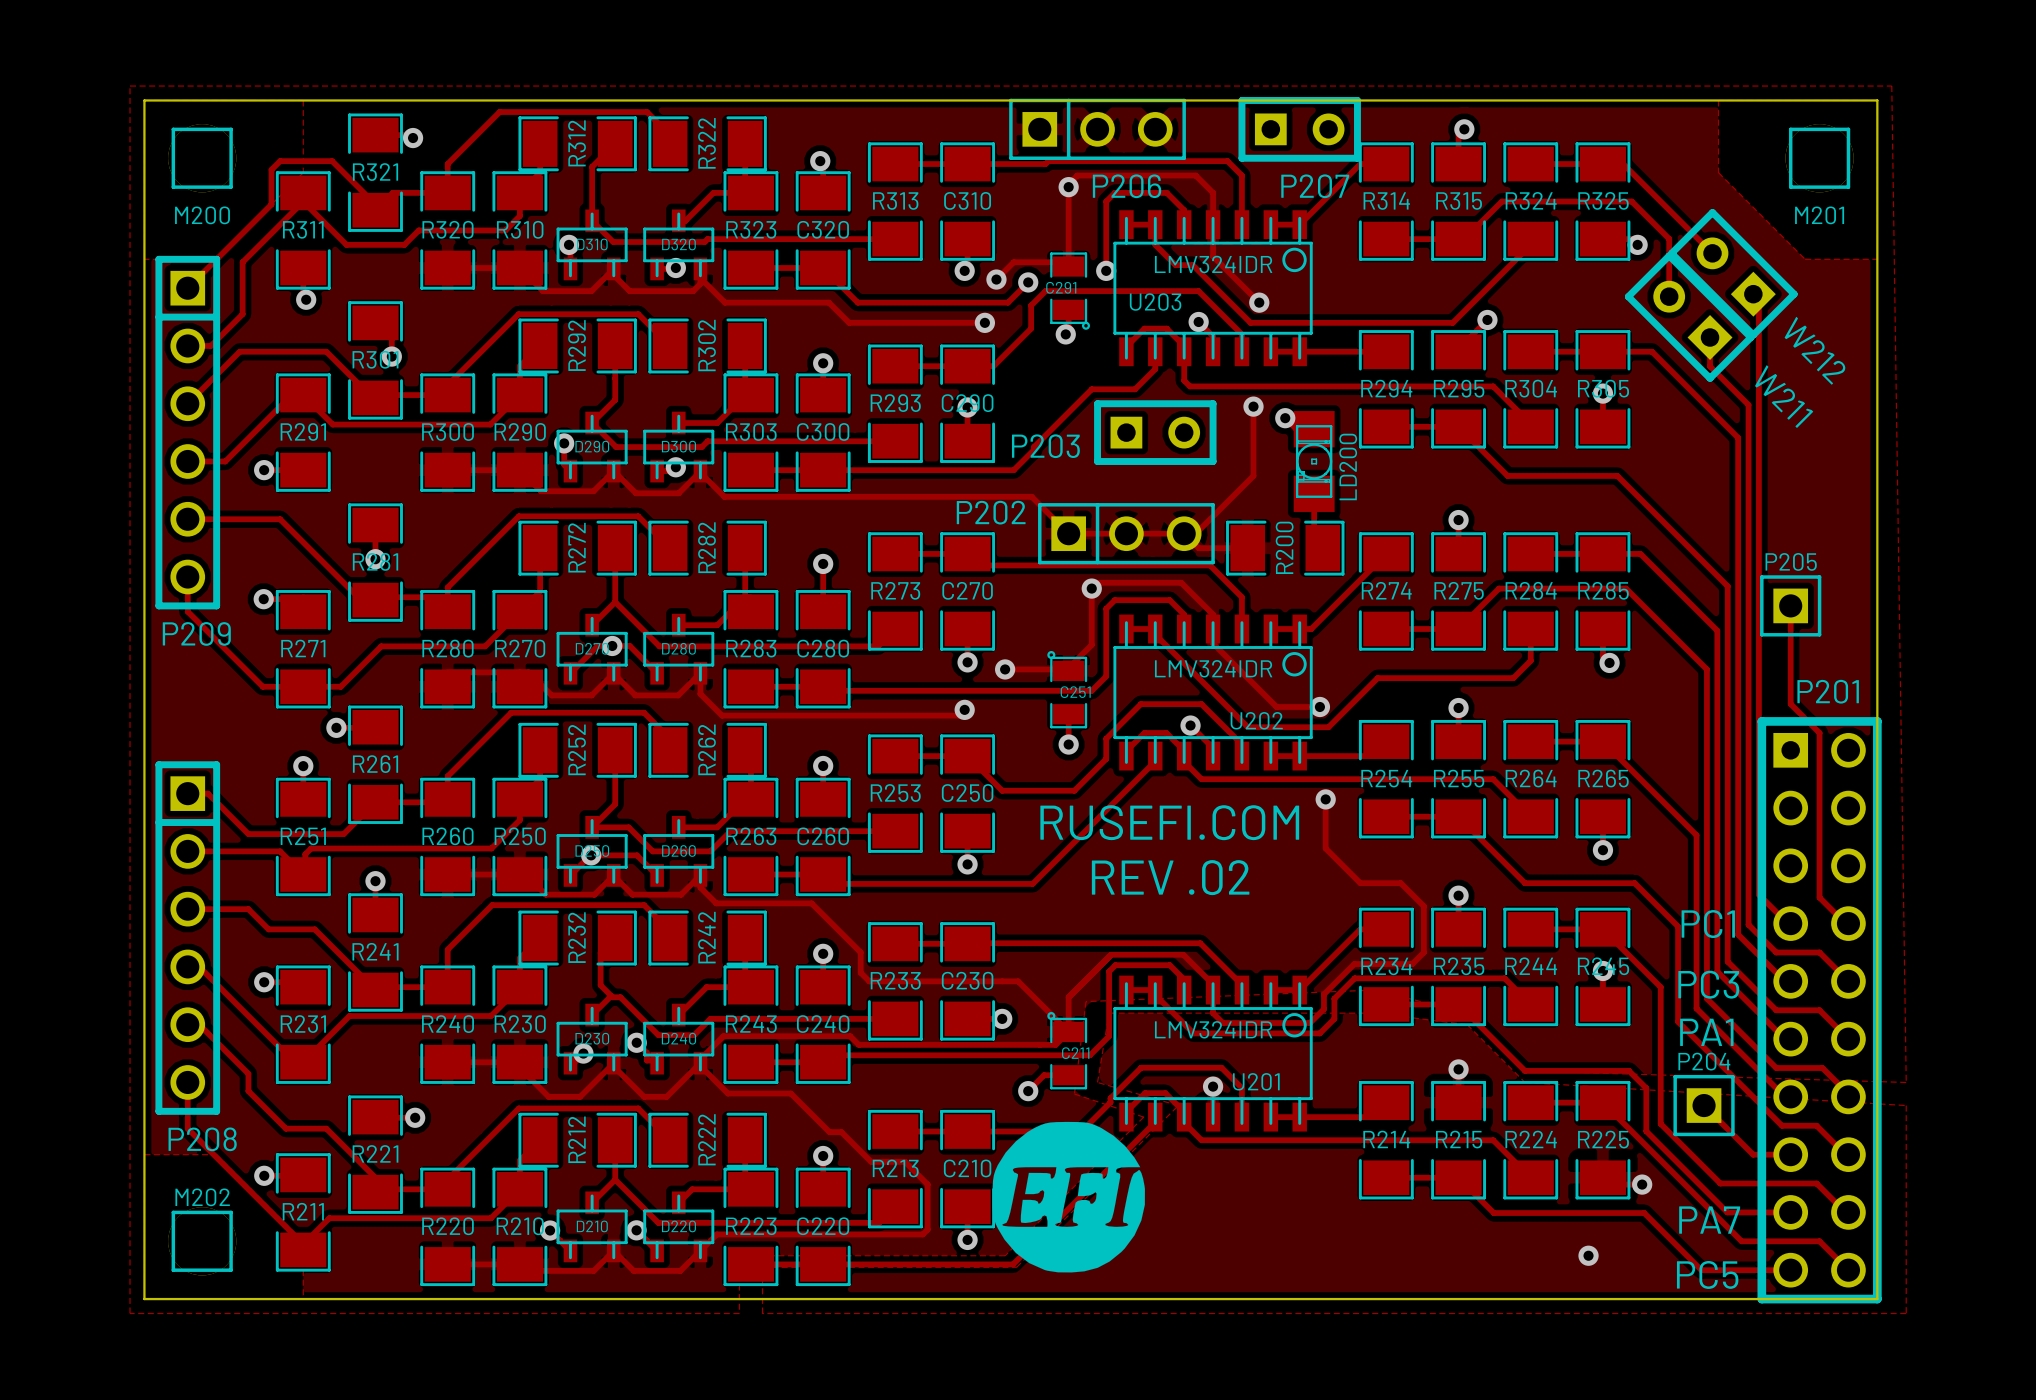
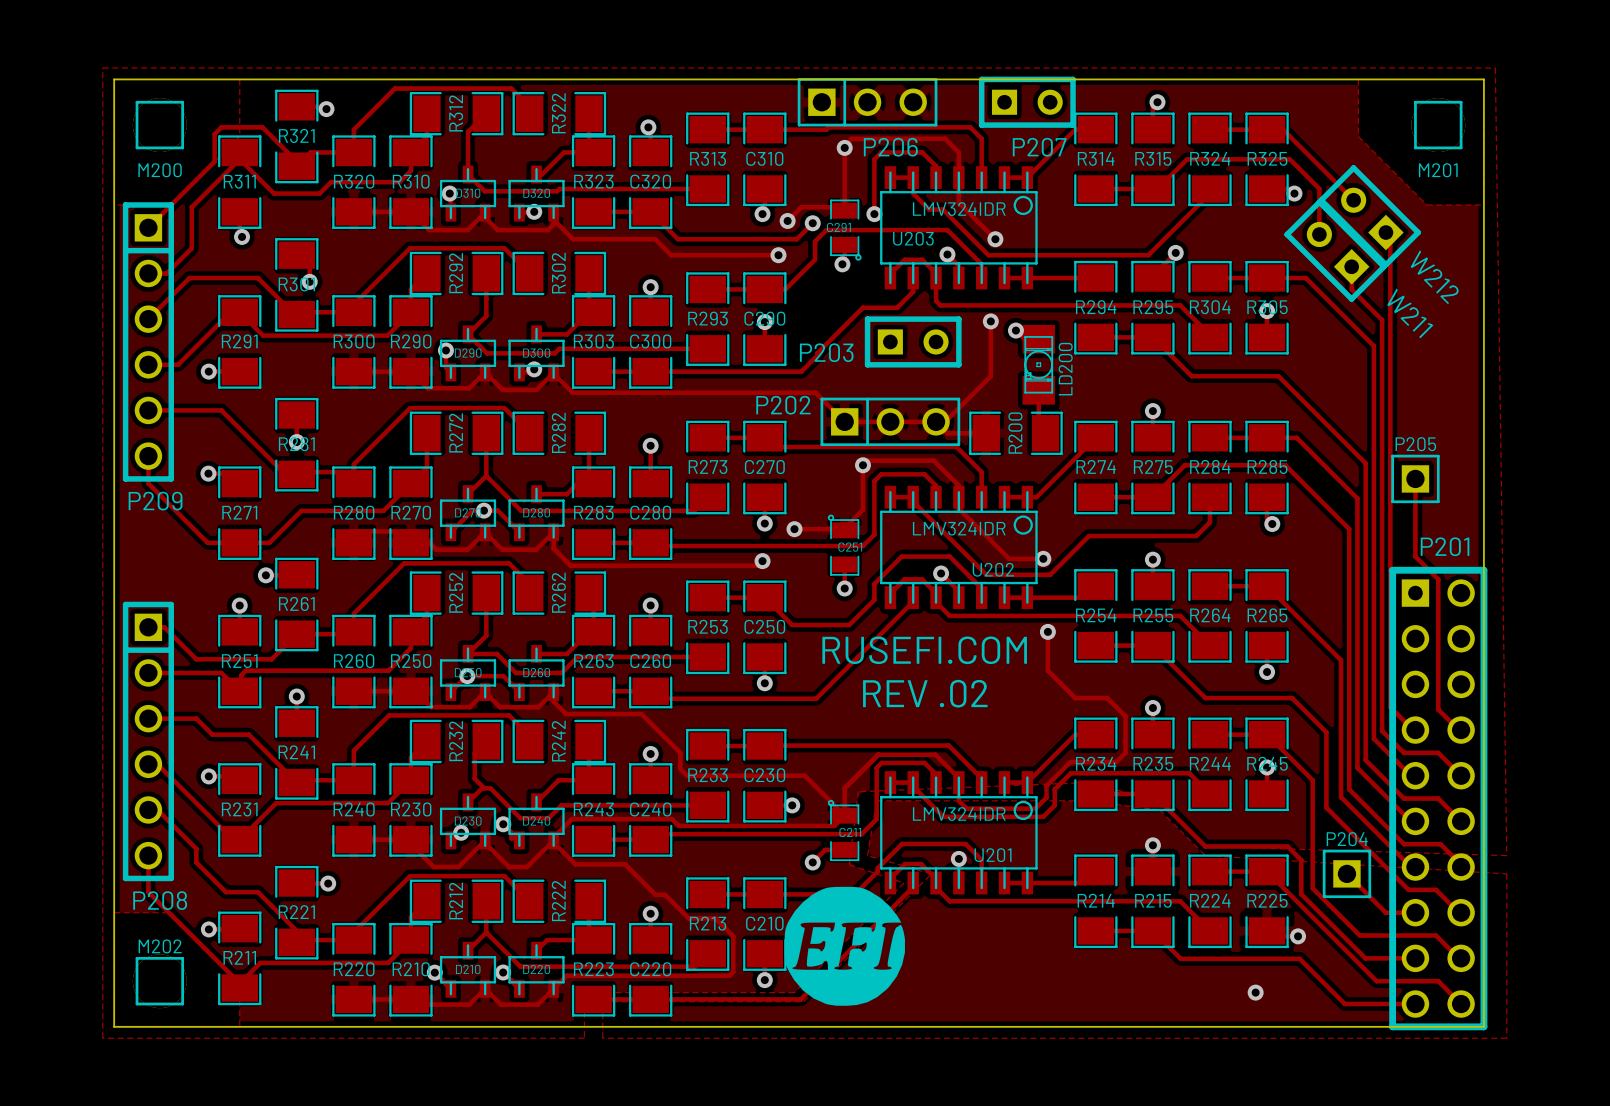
text: PC1 (1708, 924) -> none
text: PC3 (1708, 984) -> none
text: PA1 (1706, 1032) -> none
text: PA7 (1709, 1220) -> none
text: PC5 (1707, 1274) -> none

